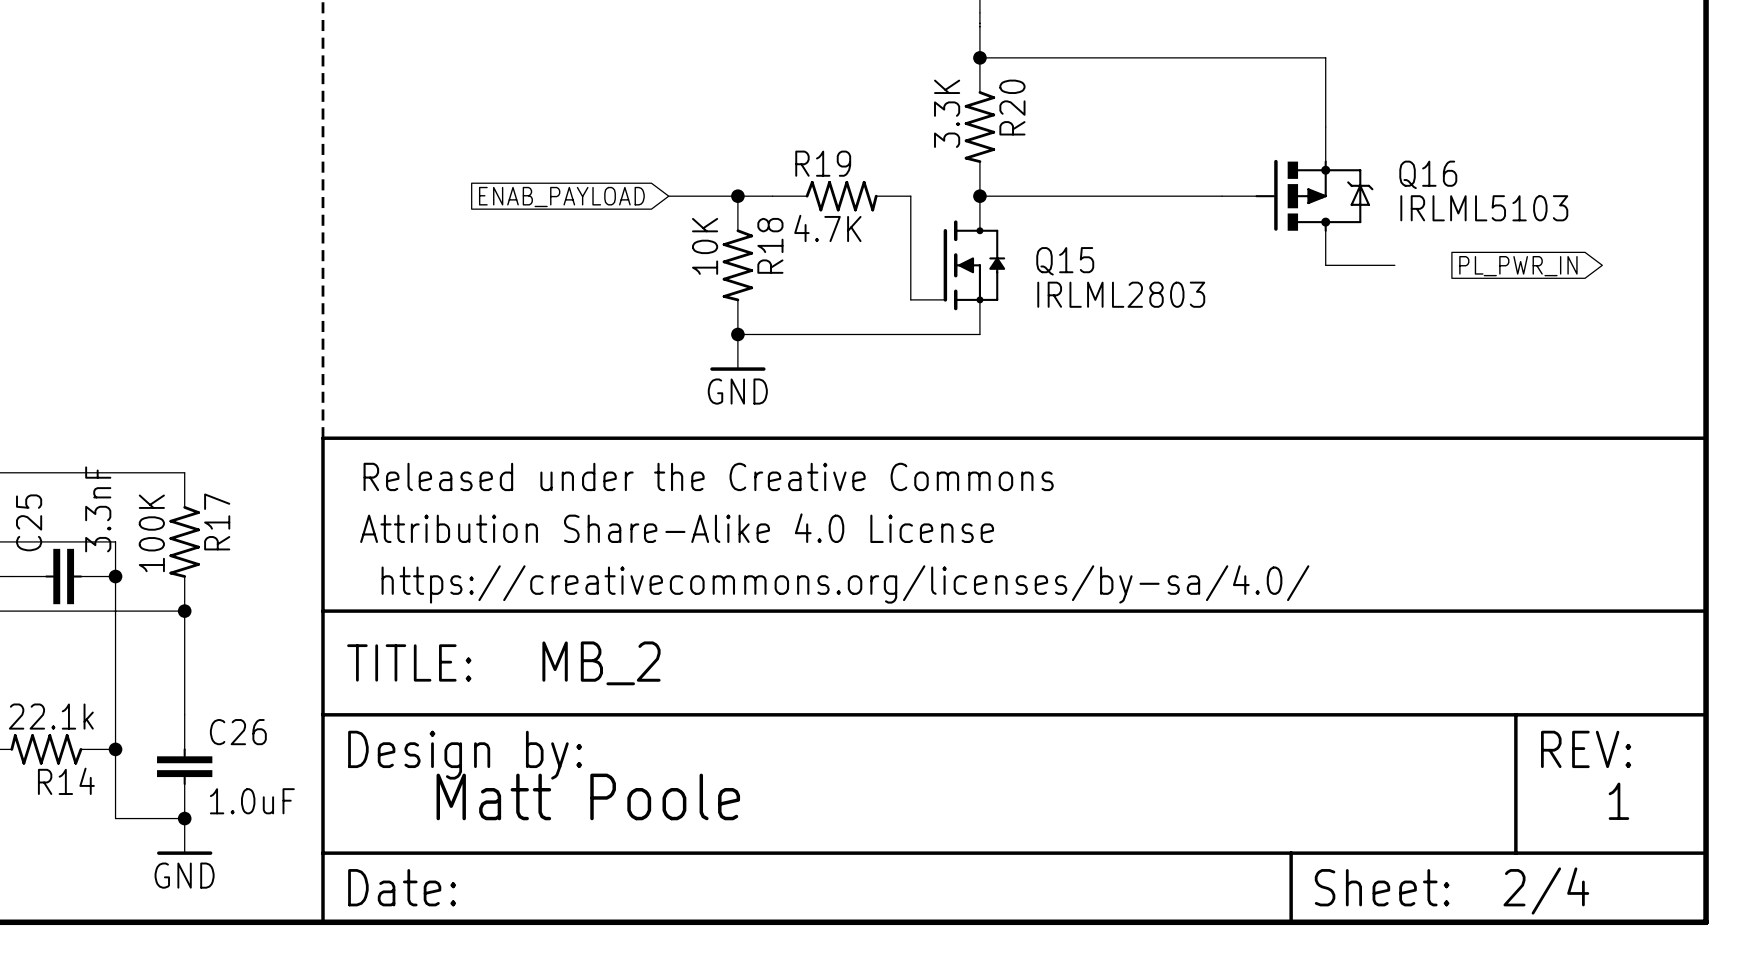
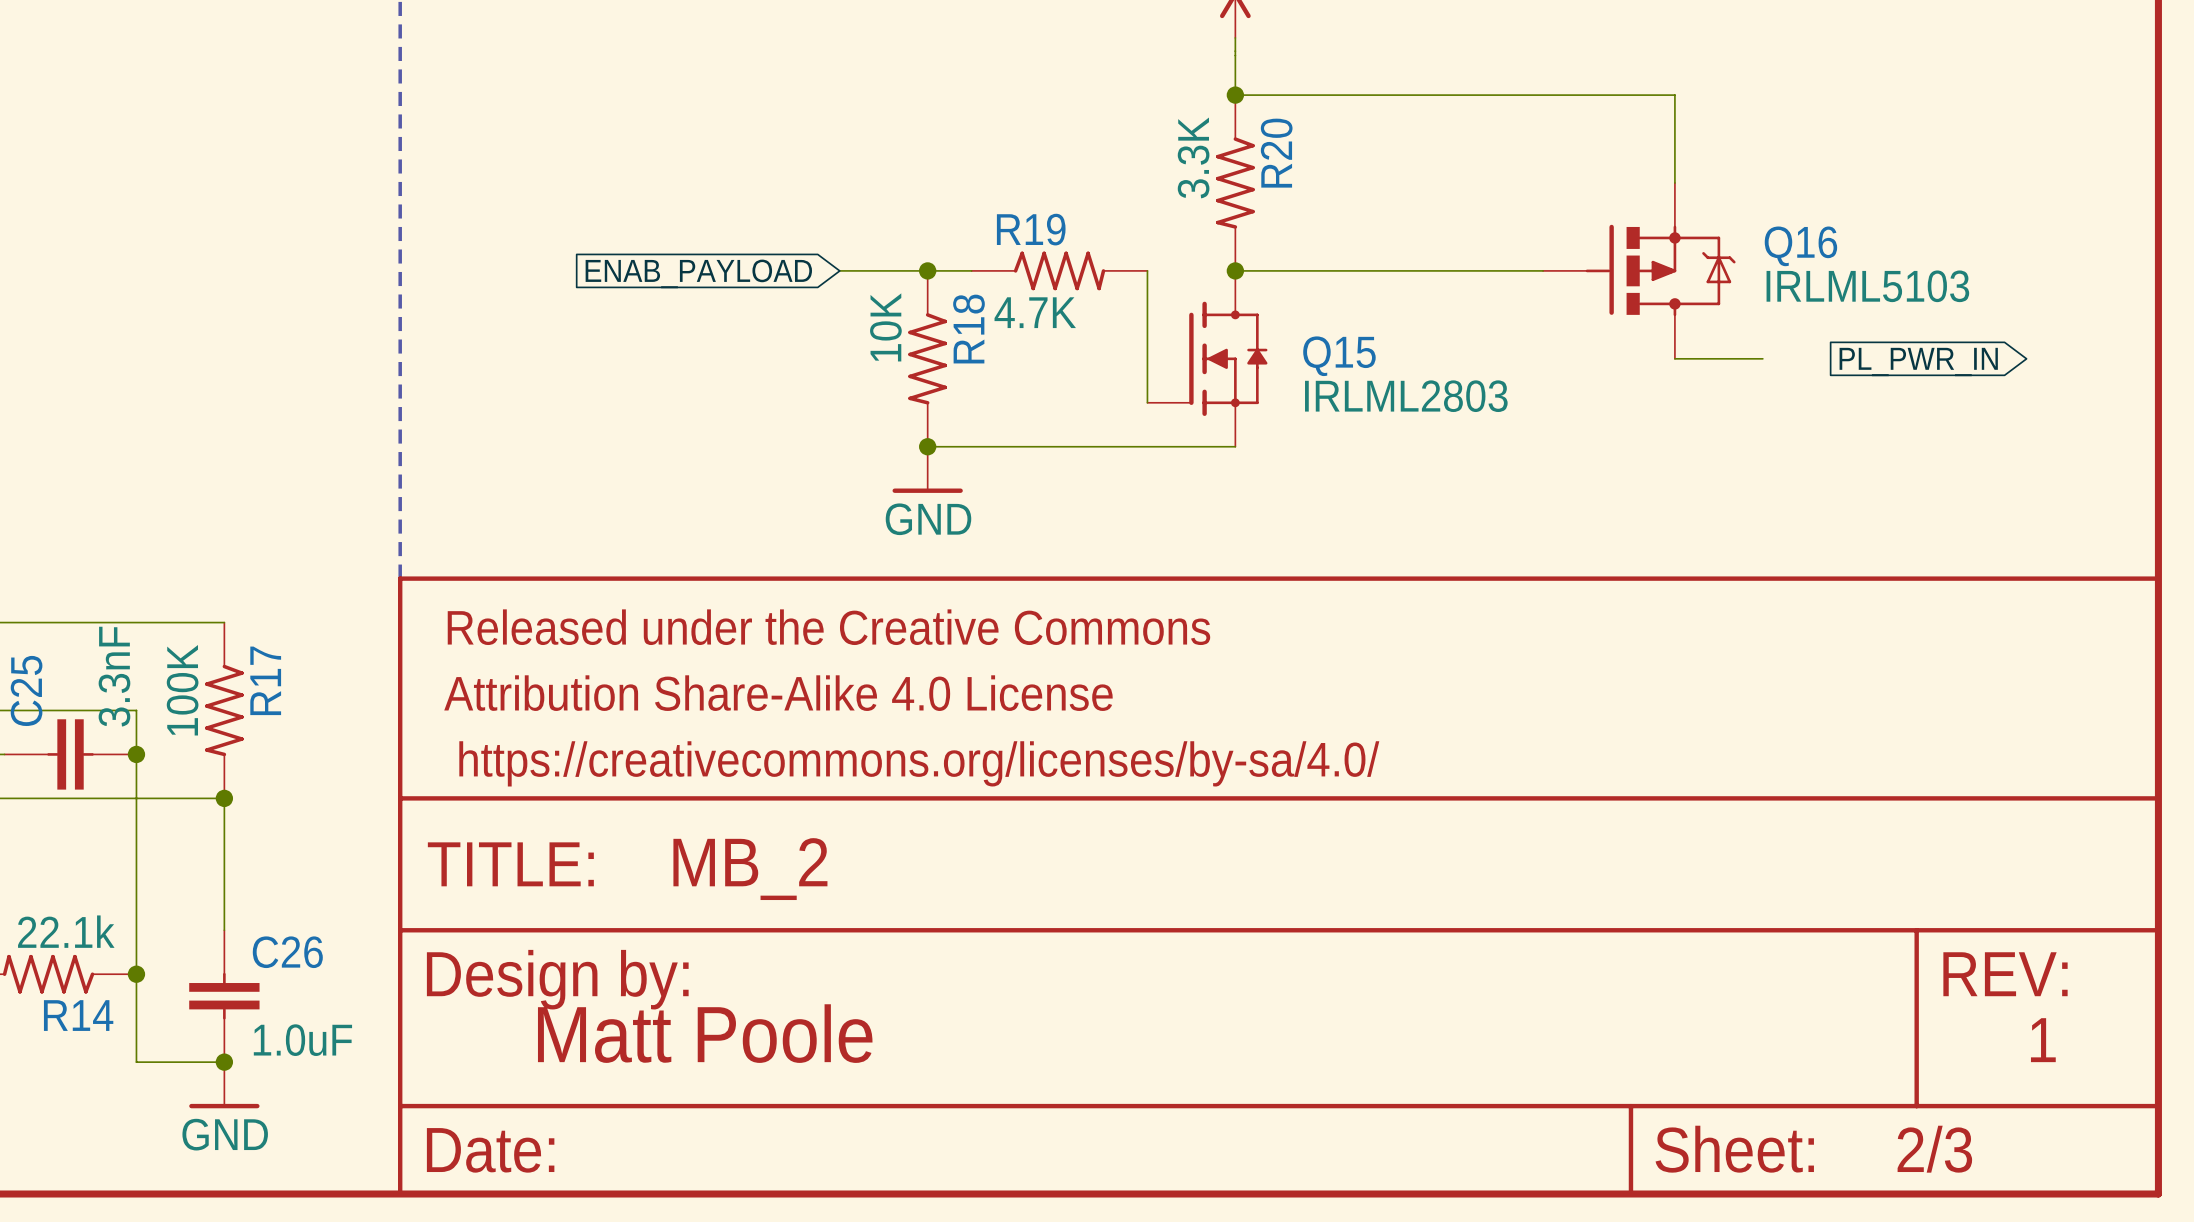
part text: 2/4 (1546, 891) -> 2/3 (1934, 1149)

